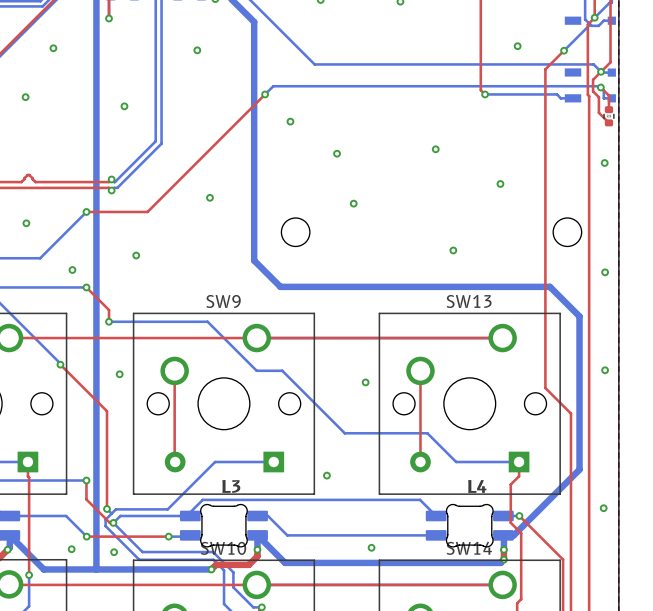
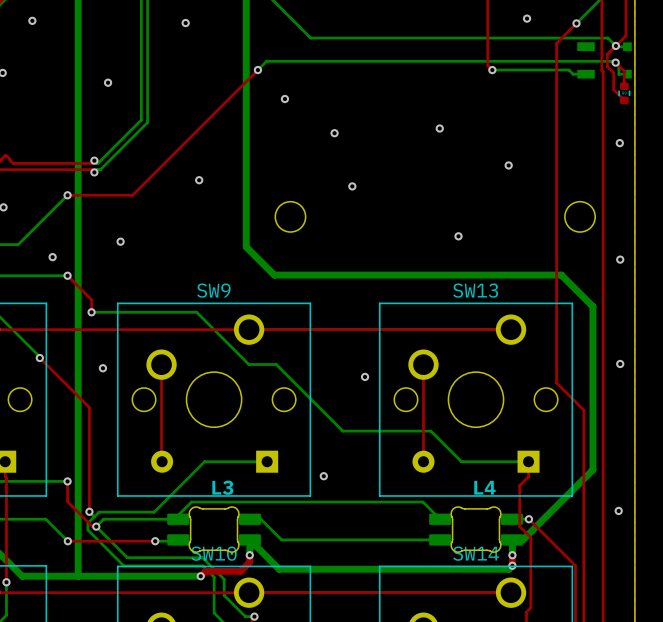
via: (371, 547) -> none
via: (71, 549) -> none
via: (114, 552) -> none

